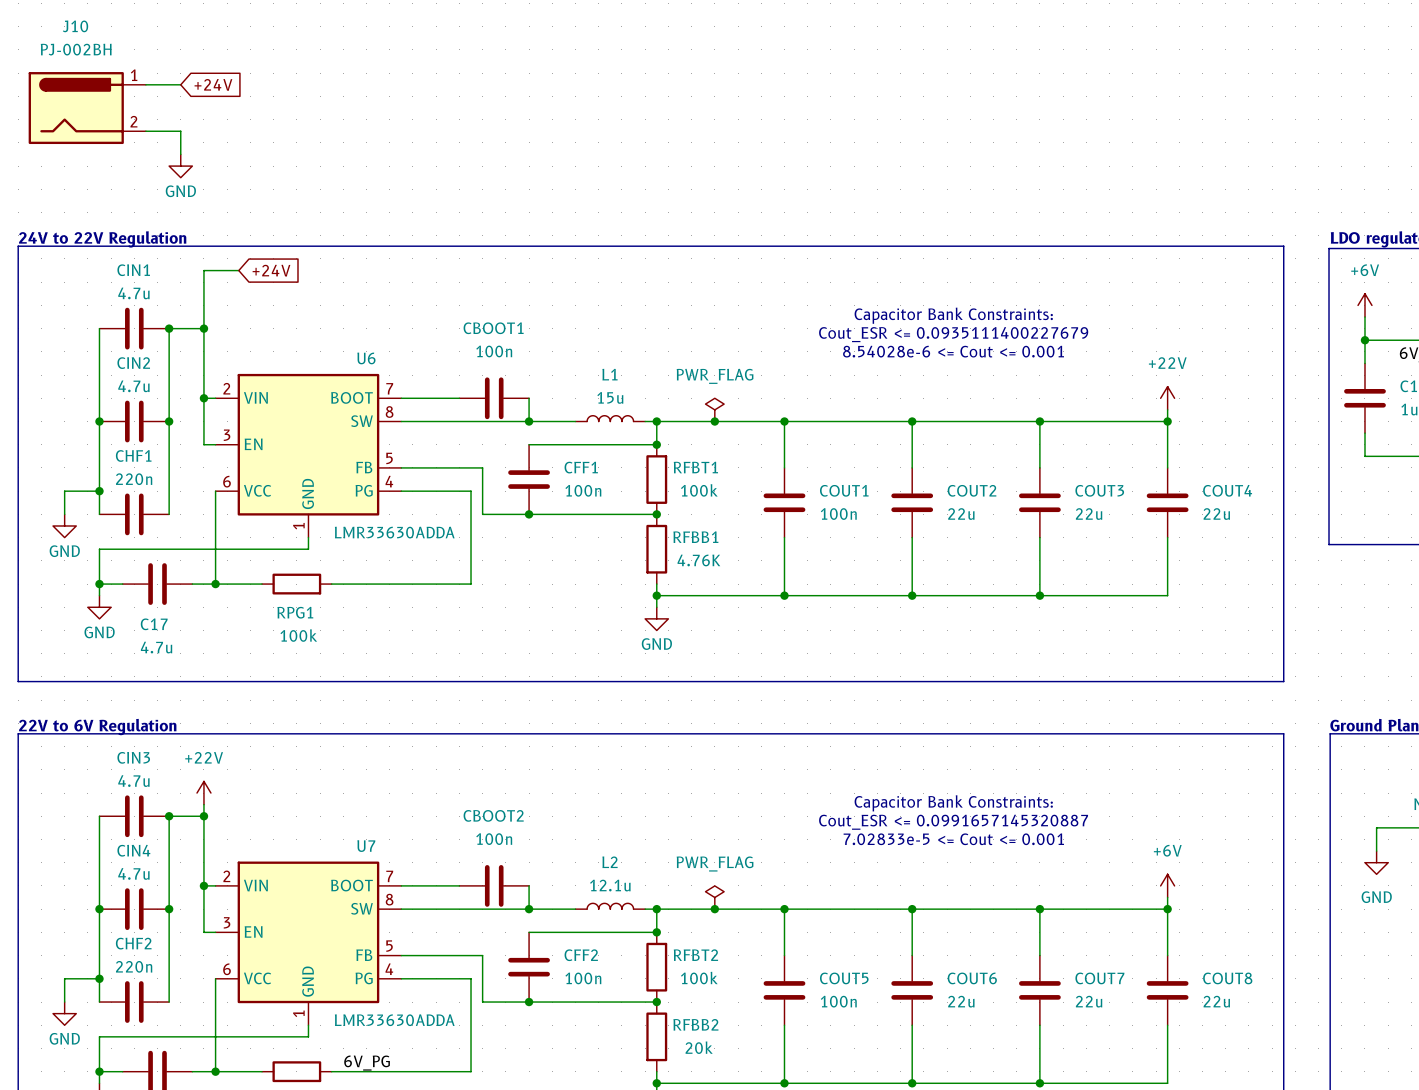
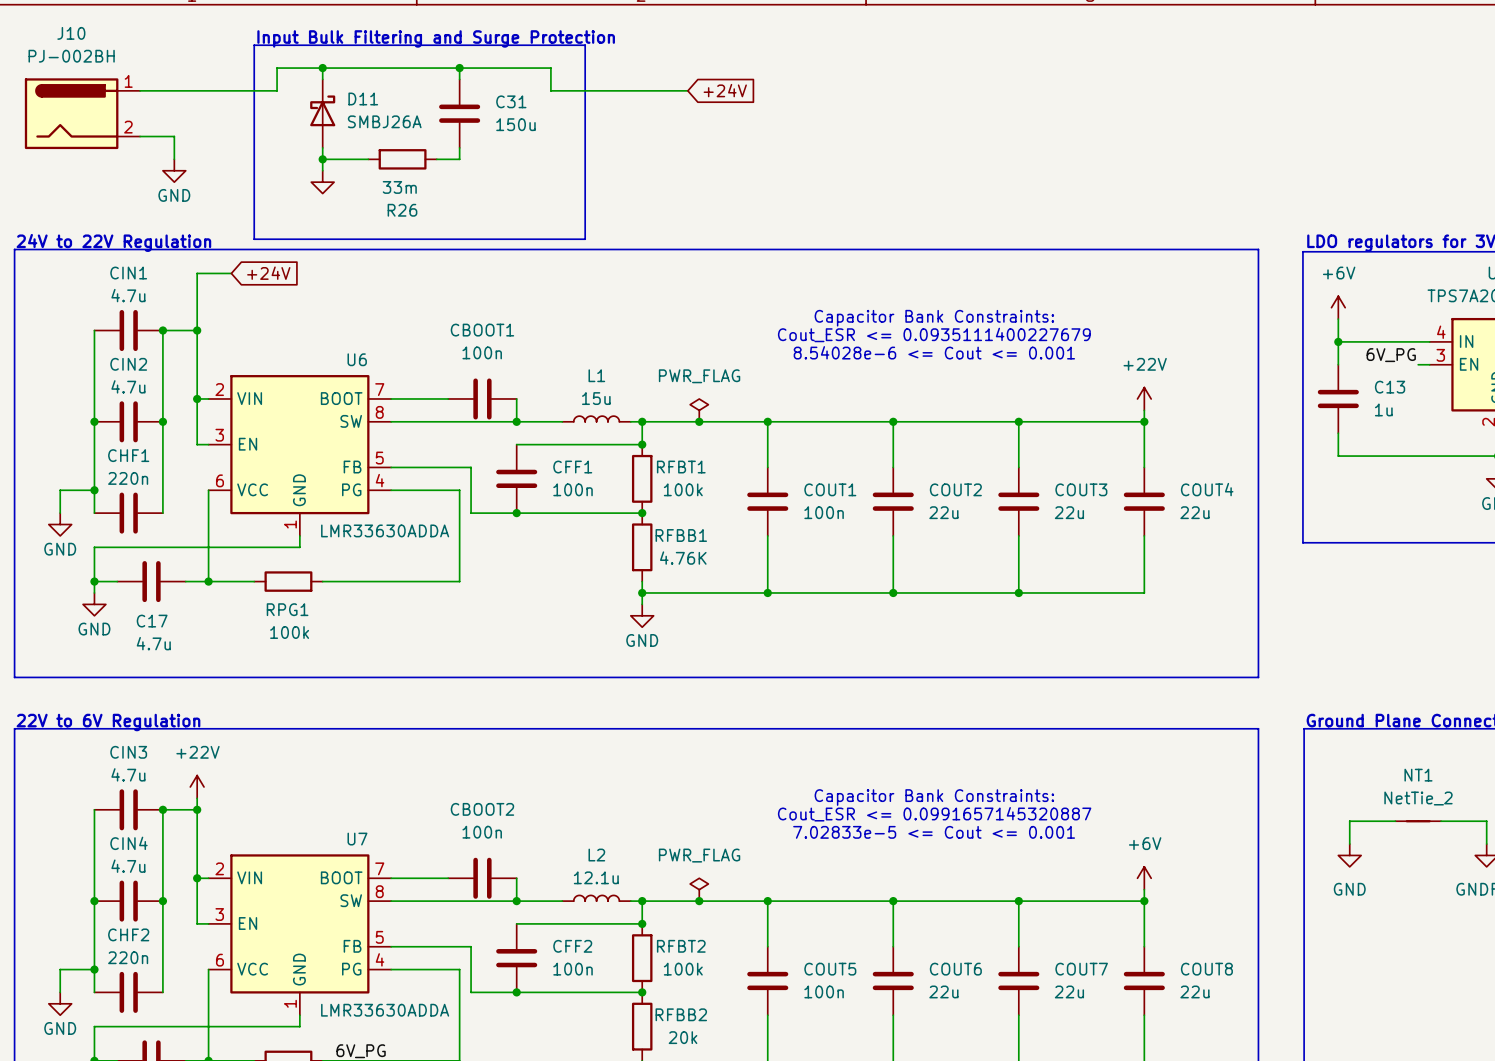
text: none -> Input Bulk Filtering and Surge Protection (436, 38)
line: none -> (254, 45) (585, 45) (585, 239) (254, 239) (254, 45)
wire: none -> (322, 68) (322, 79)
junction: none -> (322, 68)
wire: none -> (459, 68) (459, 79)
junction: none -> (459, 68)
wire: none -> (174, 90) (277, 90) (277, 68) (550, 68) (550, 90) (687, 90)
global label: +24V (213, 84) -> none
global label: none -> +24V (725, 90)
D11: none -> SMBJ26A (322, 113)
C31: none -> 150u (459, 113)
wire: none -> (322, 147) (322, 170)
wire: none -> (459, 147) (459, 159) (436, 159)
wire: none -> (322, 159) (368, 159)
junction: none -> (322, 159)
R26: none -> 33m (402, 159)
power symbol: none -> (322, 182)

